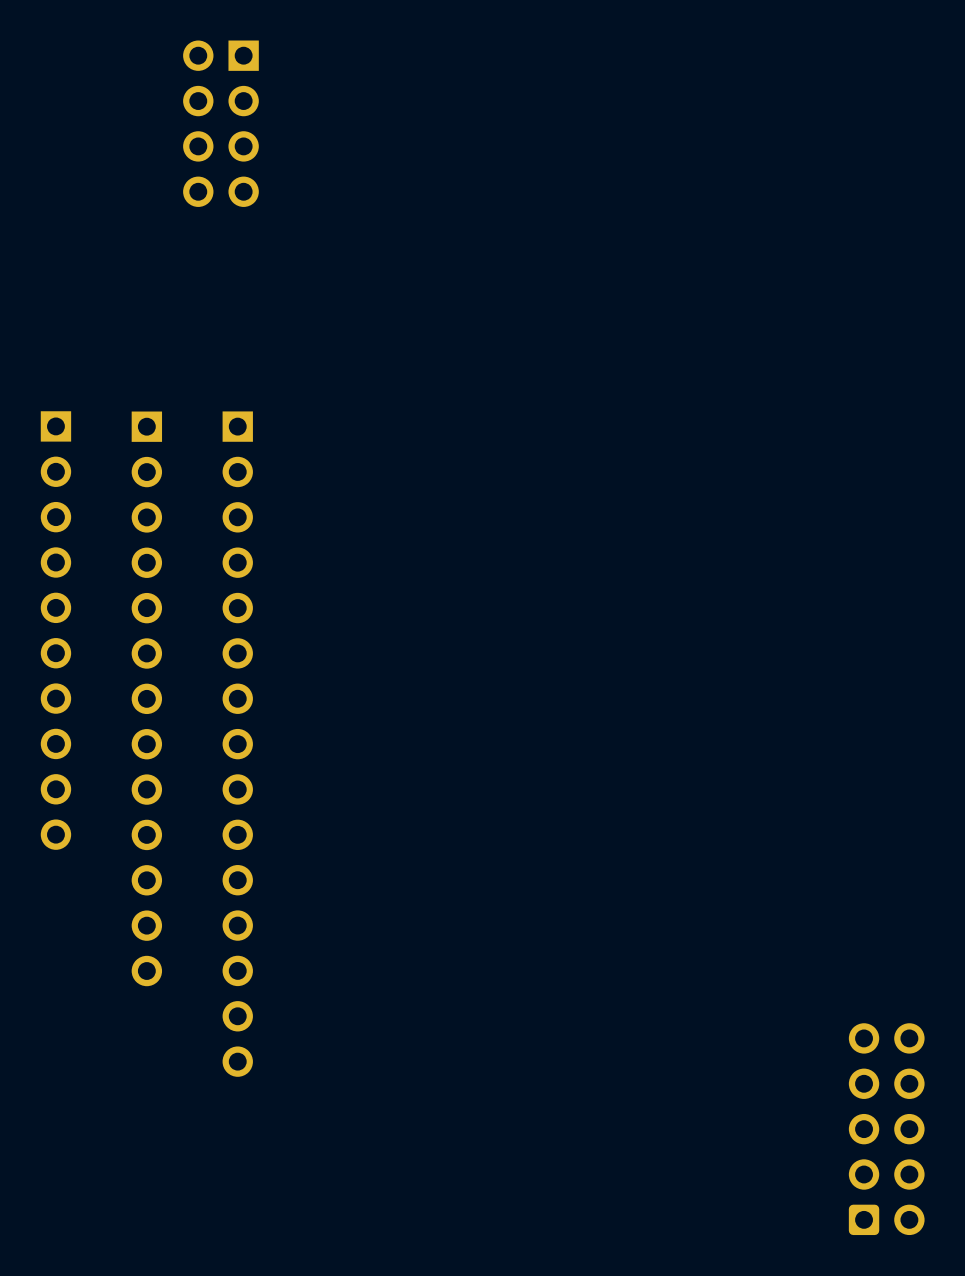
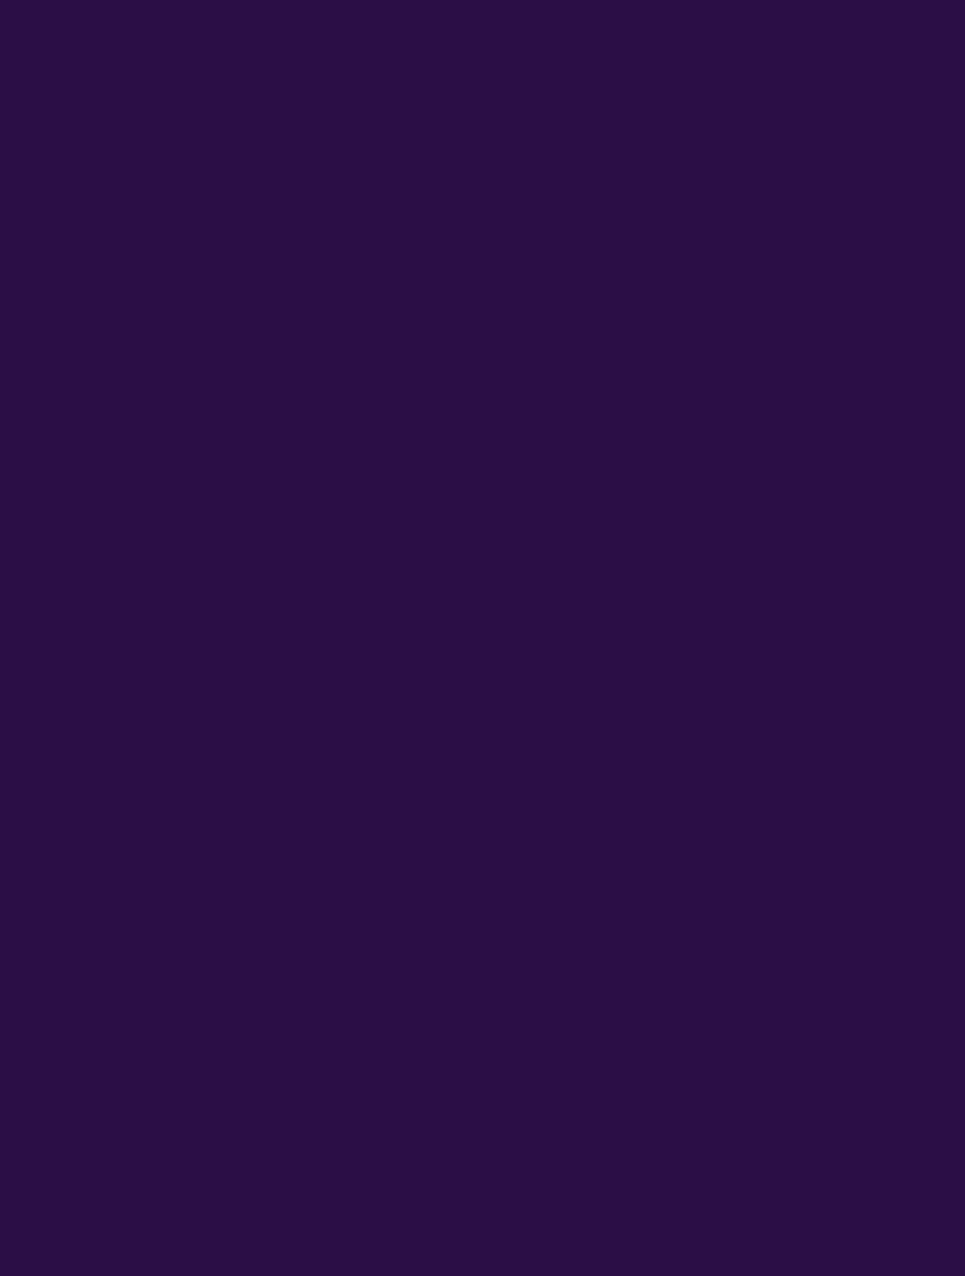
part: (220, 123) -> none
part: (55, 630) -> none
part: (146, 698) -> none
part: (237, 744) -> none
part: (886, 1129) -> none

